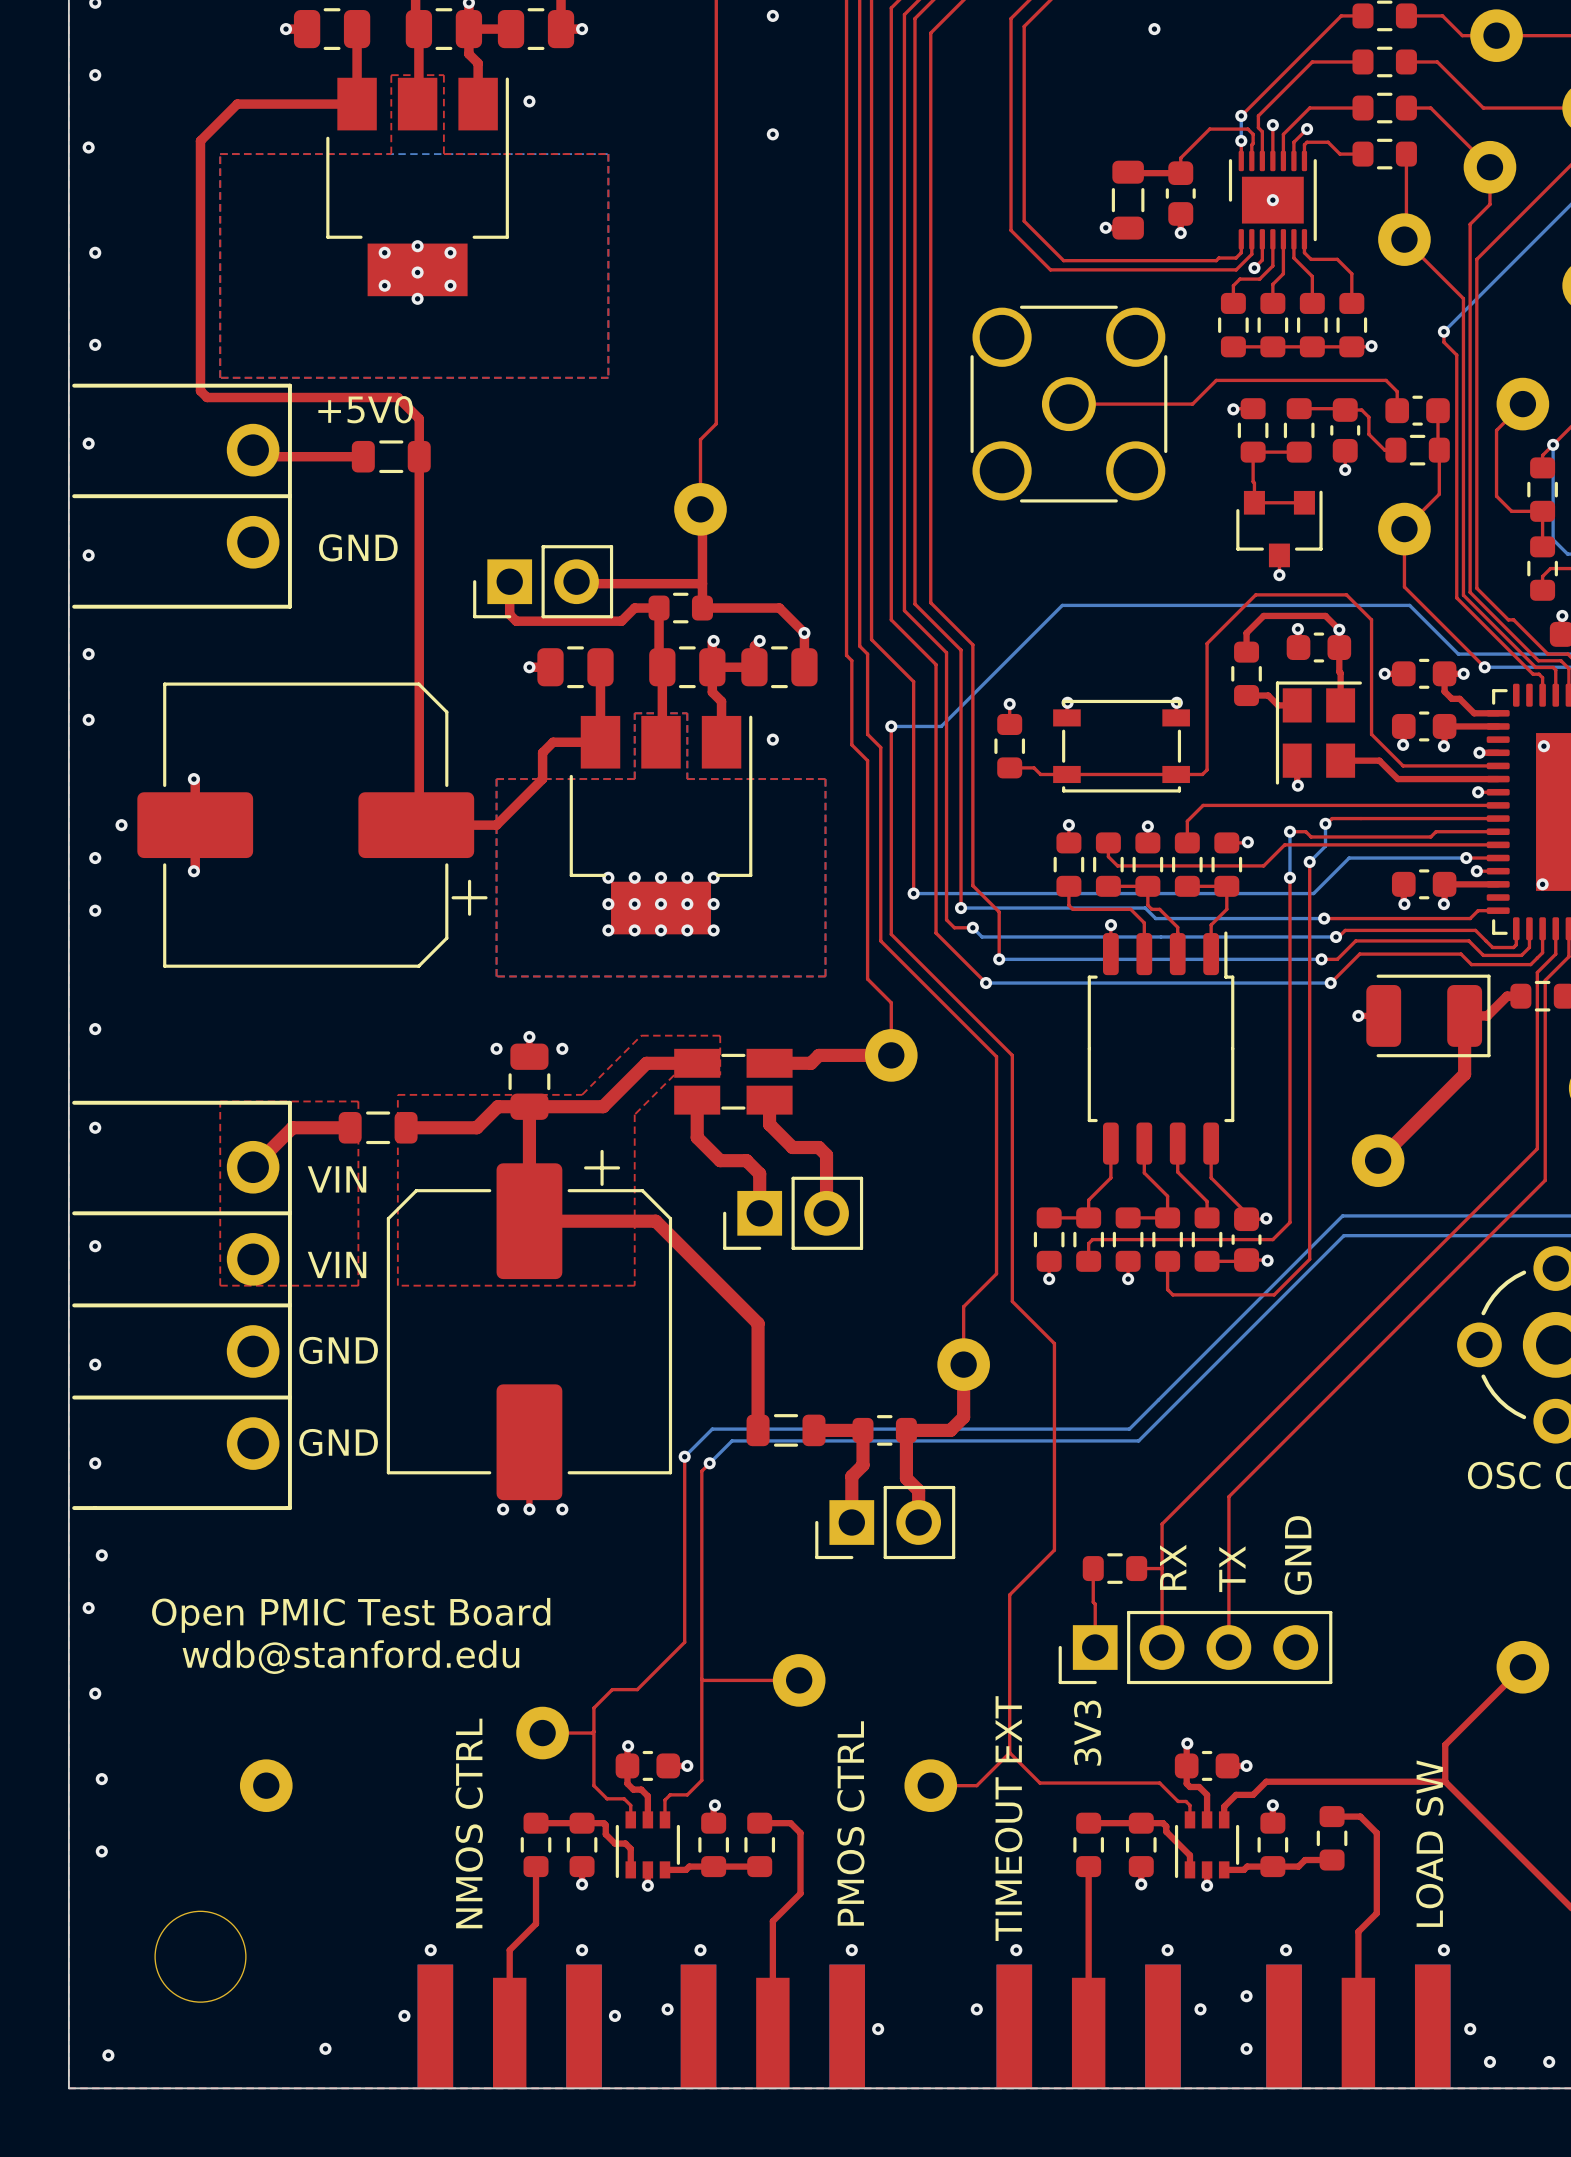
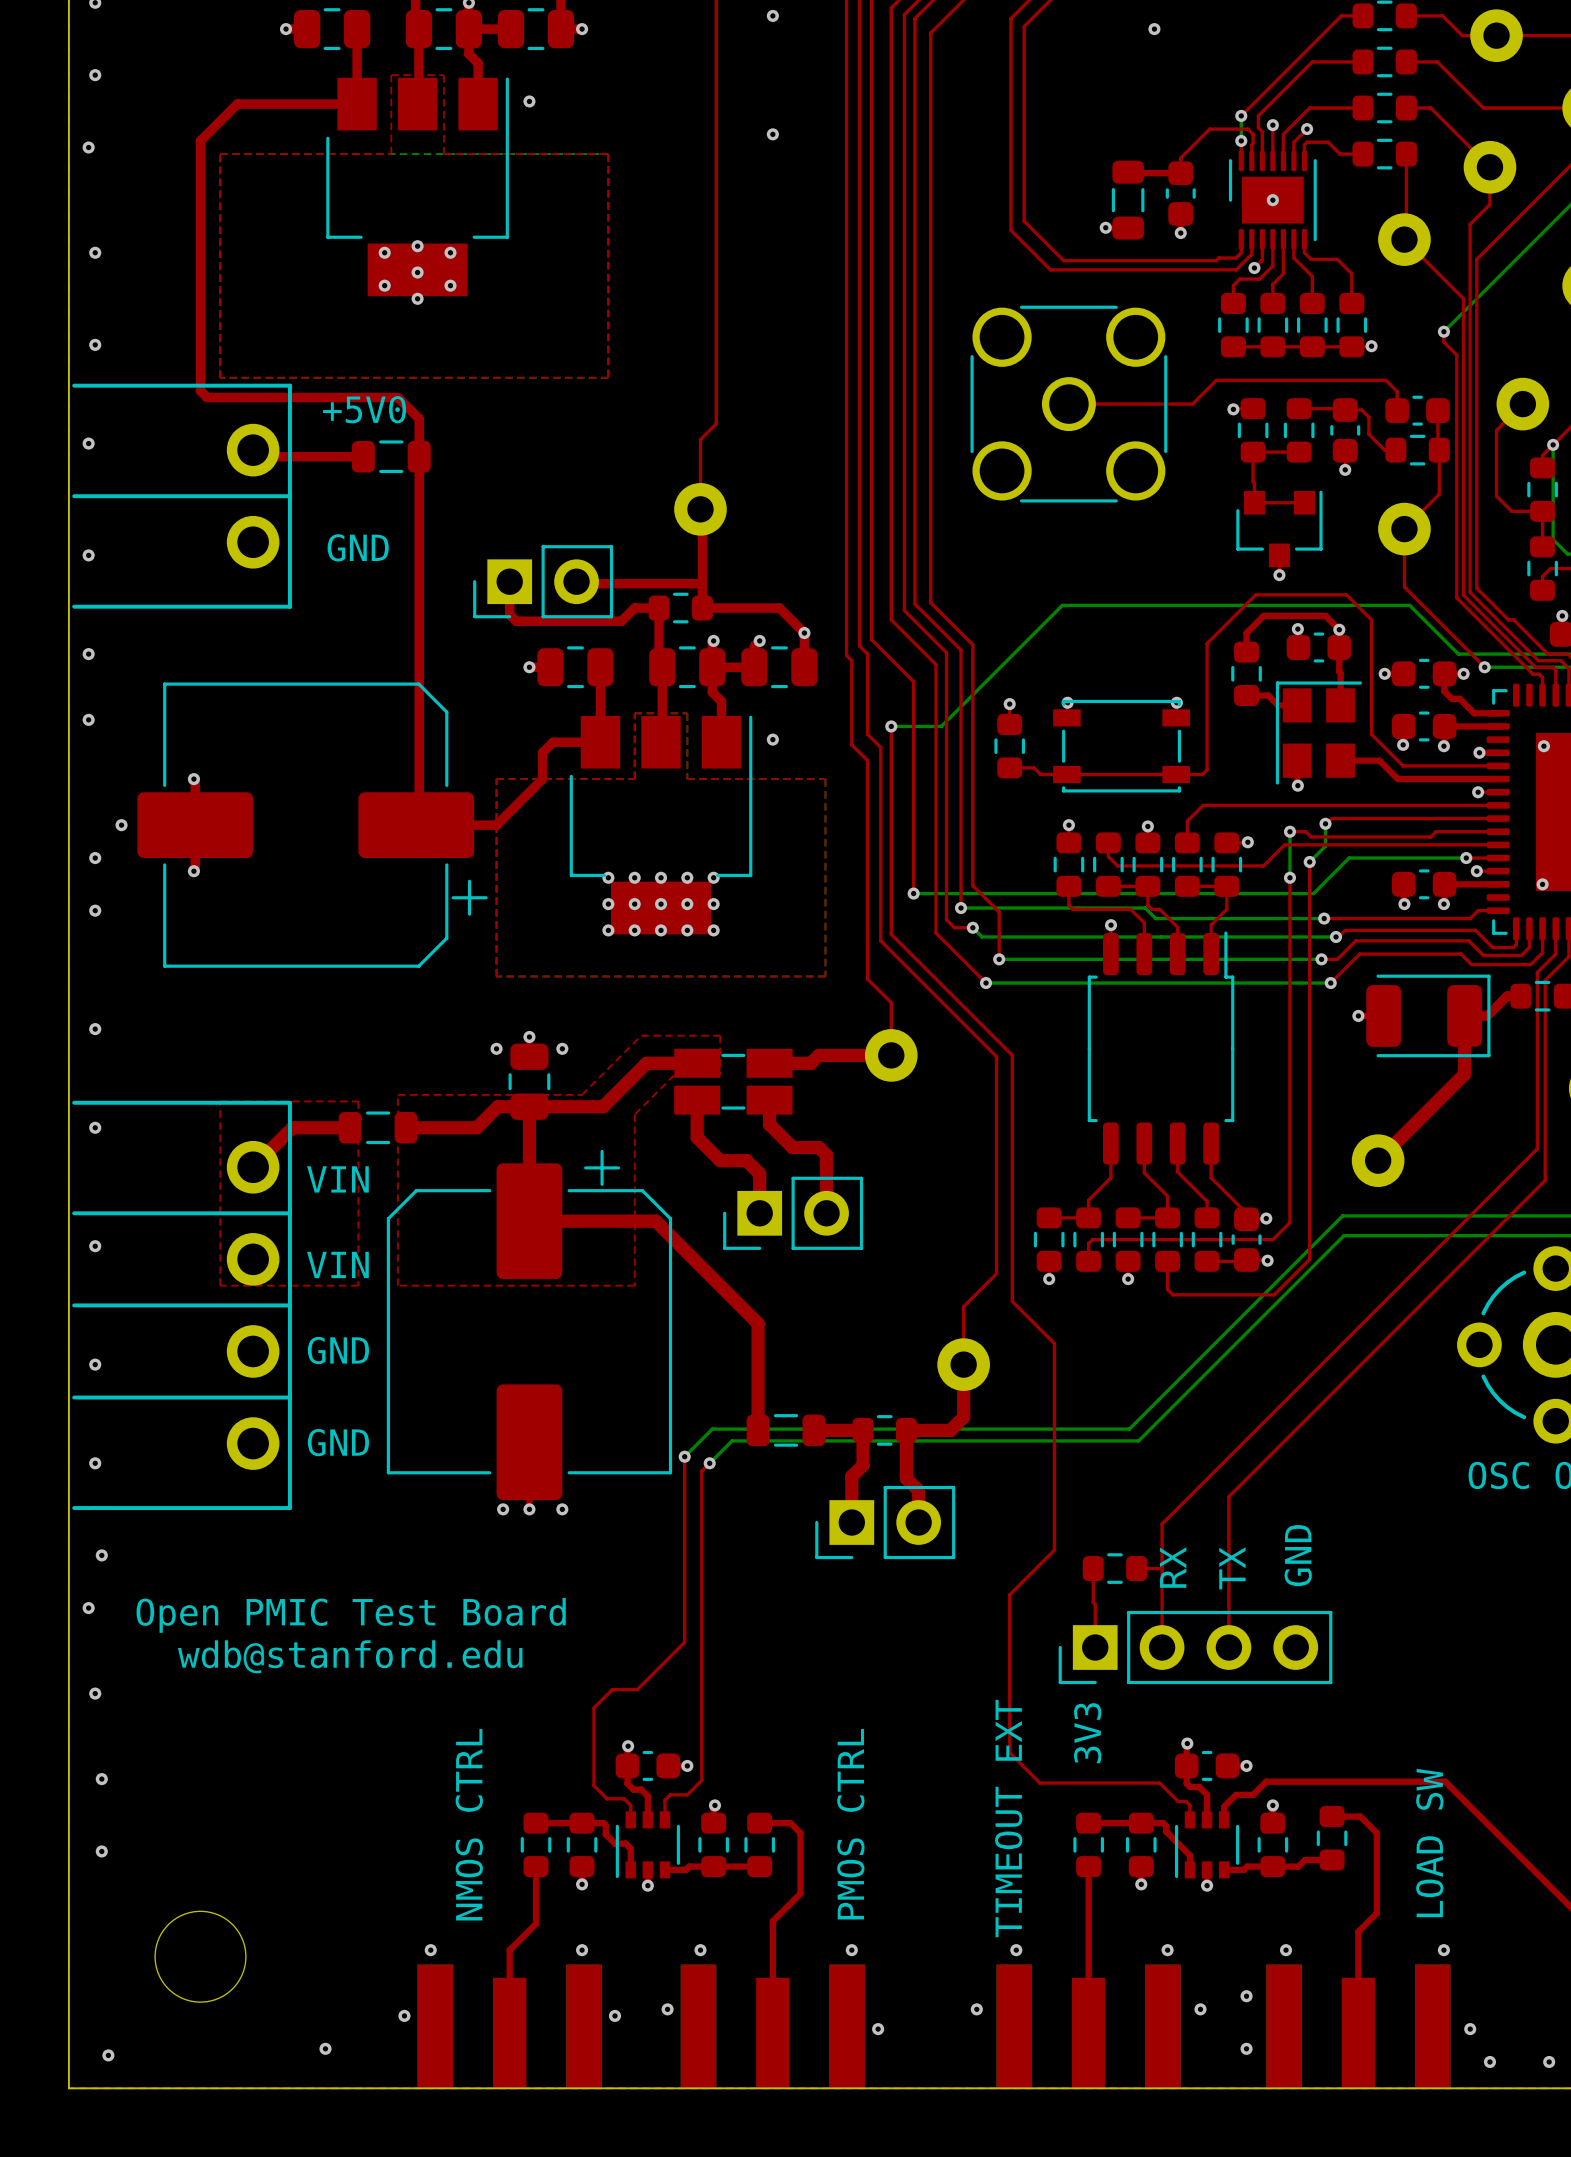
top track: (1522, 1667) (1445, 1744) (1445, 1781) -> none
part: (1522, 1667) -> none
top track: (701, 1679) (799, 1680) -> none
part: (799, 1680) -> none
top track: (593, 1731) (542, 1733) -> none
part: (542, 1733) -> none
top track: (1009, 1752) (976, 1785) (930, 1785) -> none
part: (266, 1785) -> none
part: (930, 1785) -> none

